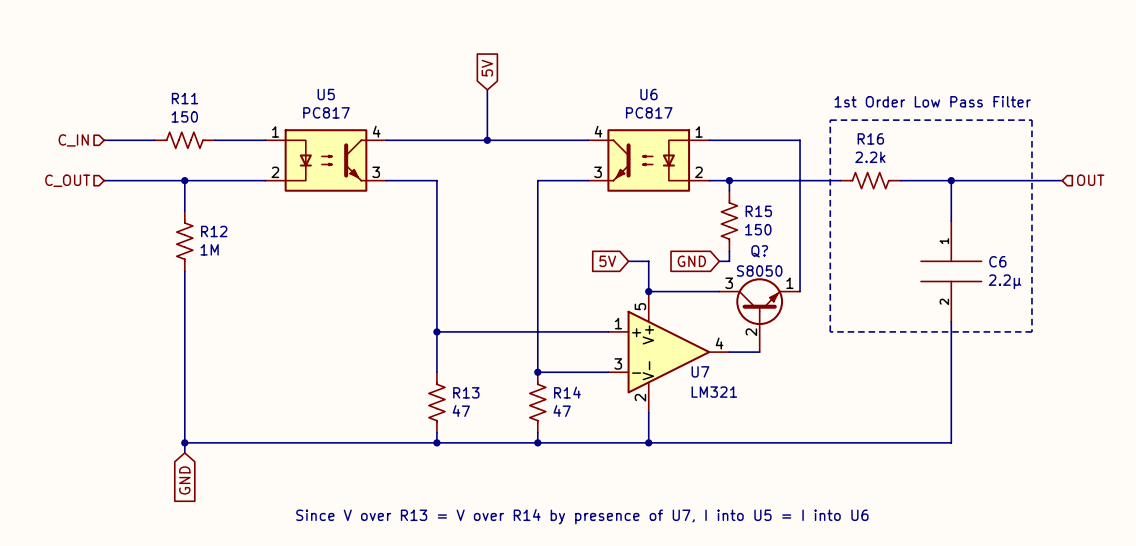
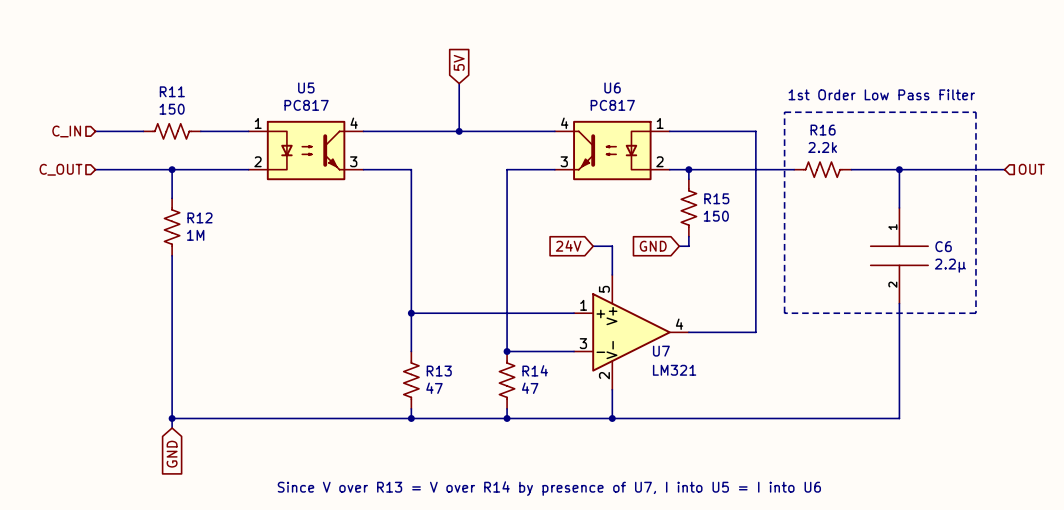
global label: 5V (607, 261) -> 24V (568, 246)
wire: (648, 291) (719, 291) -> none
junction: (648, 291) -> none
wire: none -> (755, 274) (755, 332) (717, 332)
Q?: S8050 (759, 315) -> none

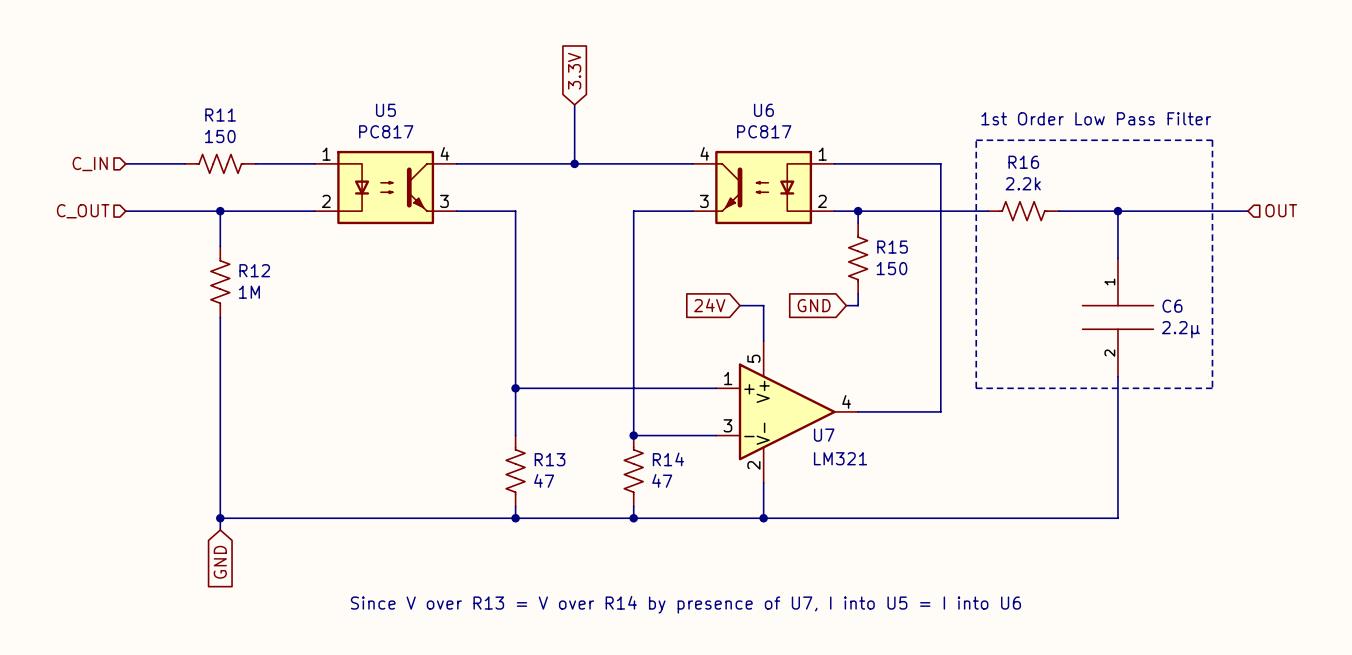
global label: 5V (459, 62) -> 3.3V (574, 71)

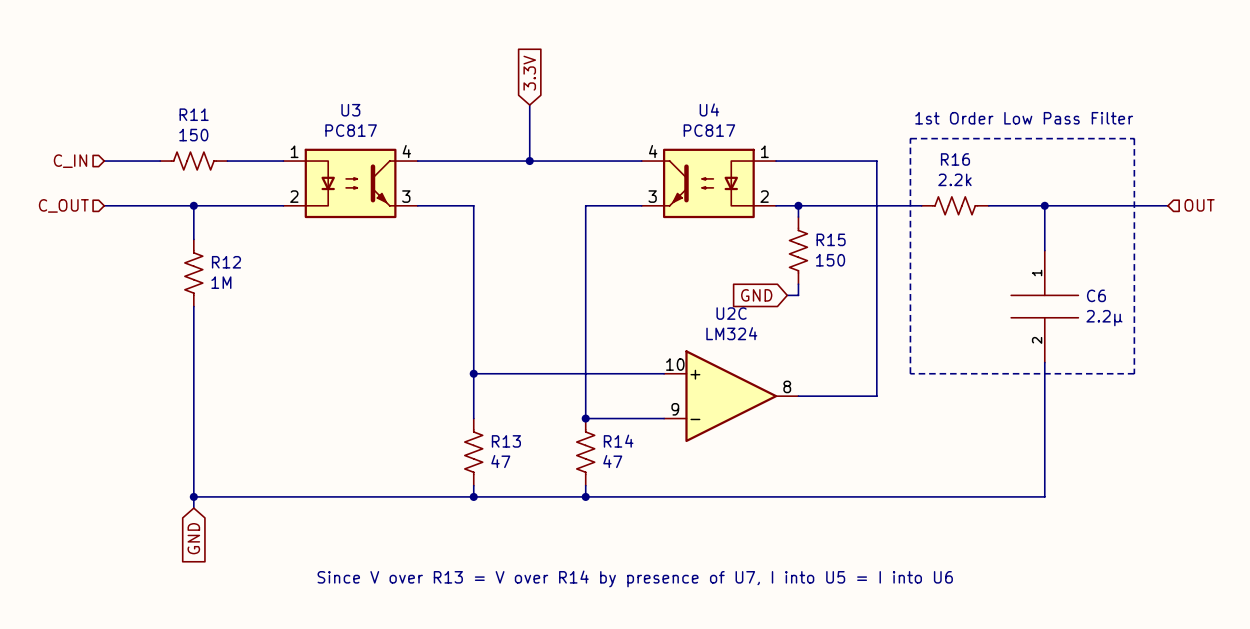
U5 name: U5 (385, 110) -> U3 (350, 110)
U6 name: U6 (763, 110) -> U4 (709, 109)
global label: 24V (709, 305) -> none
wire: (740, 305) (763, 305) (763, 341) -> none
U7: LM321 (787, 411) -> none
U2C: none -> LM324 (731, 396)
wire: (763, 482) (763, 518) -> none
junction: (763, 518) -> none

